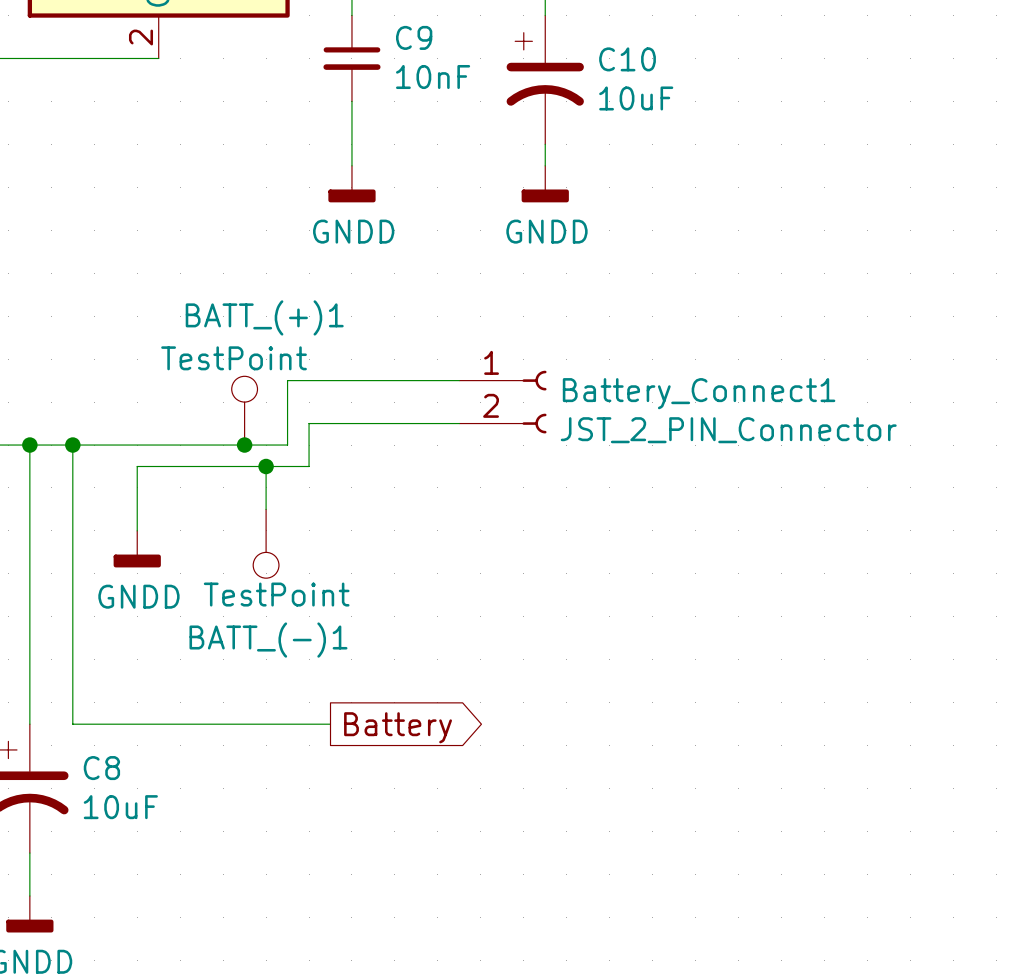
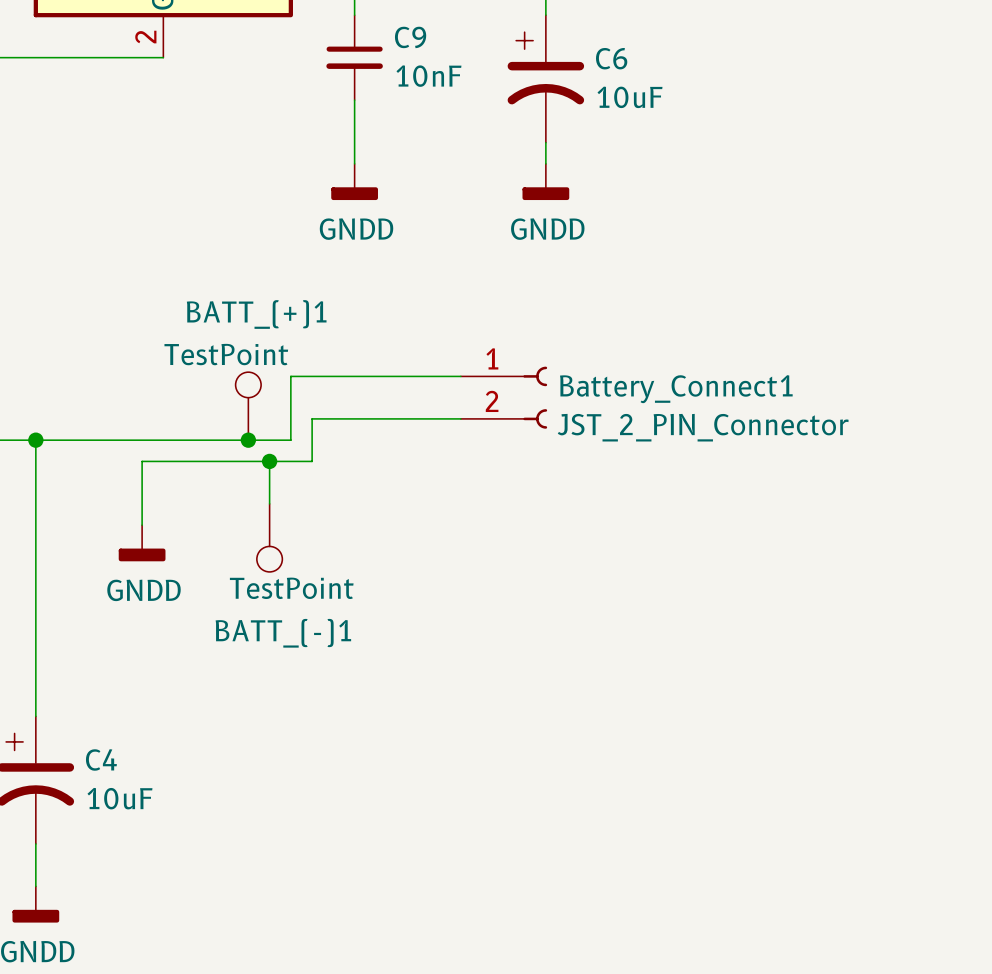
C10 name: C10 (627, 59) -> C6 (611, 58)
wire: (72, 445) (72, 724) (330, 724) -> none
junction: (72, 445) -> none
global label: Battery (398, 727) -> none
C8 name: C8 (101, 768) -> C4 (101, 759)

